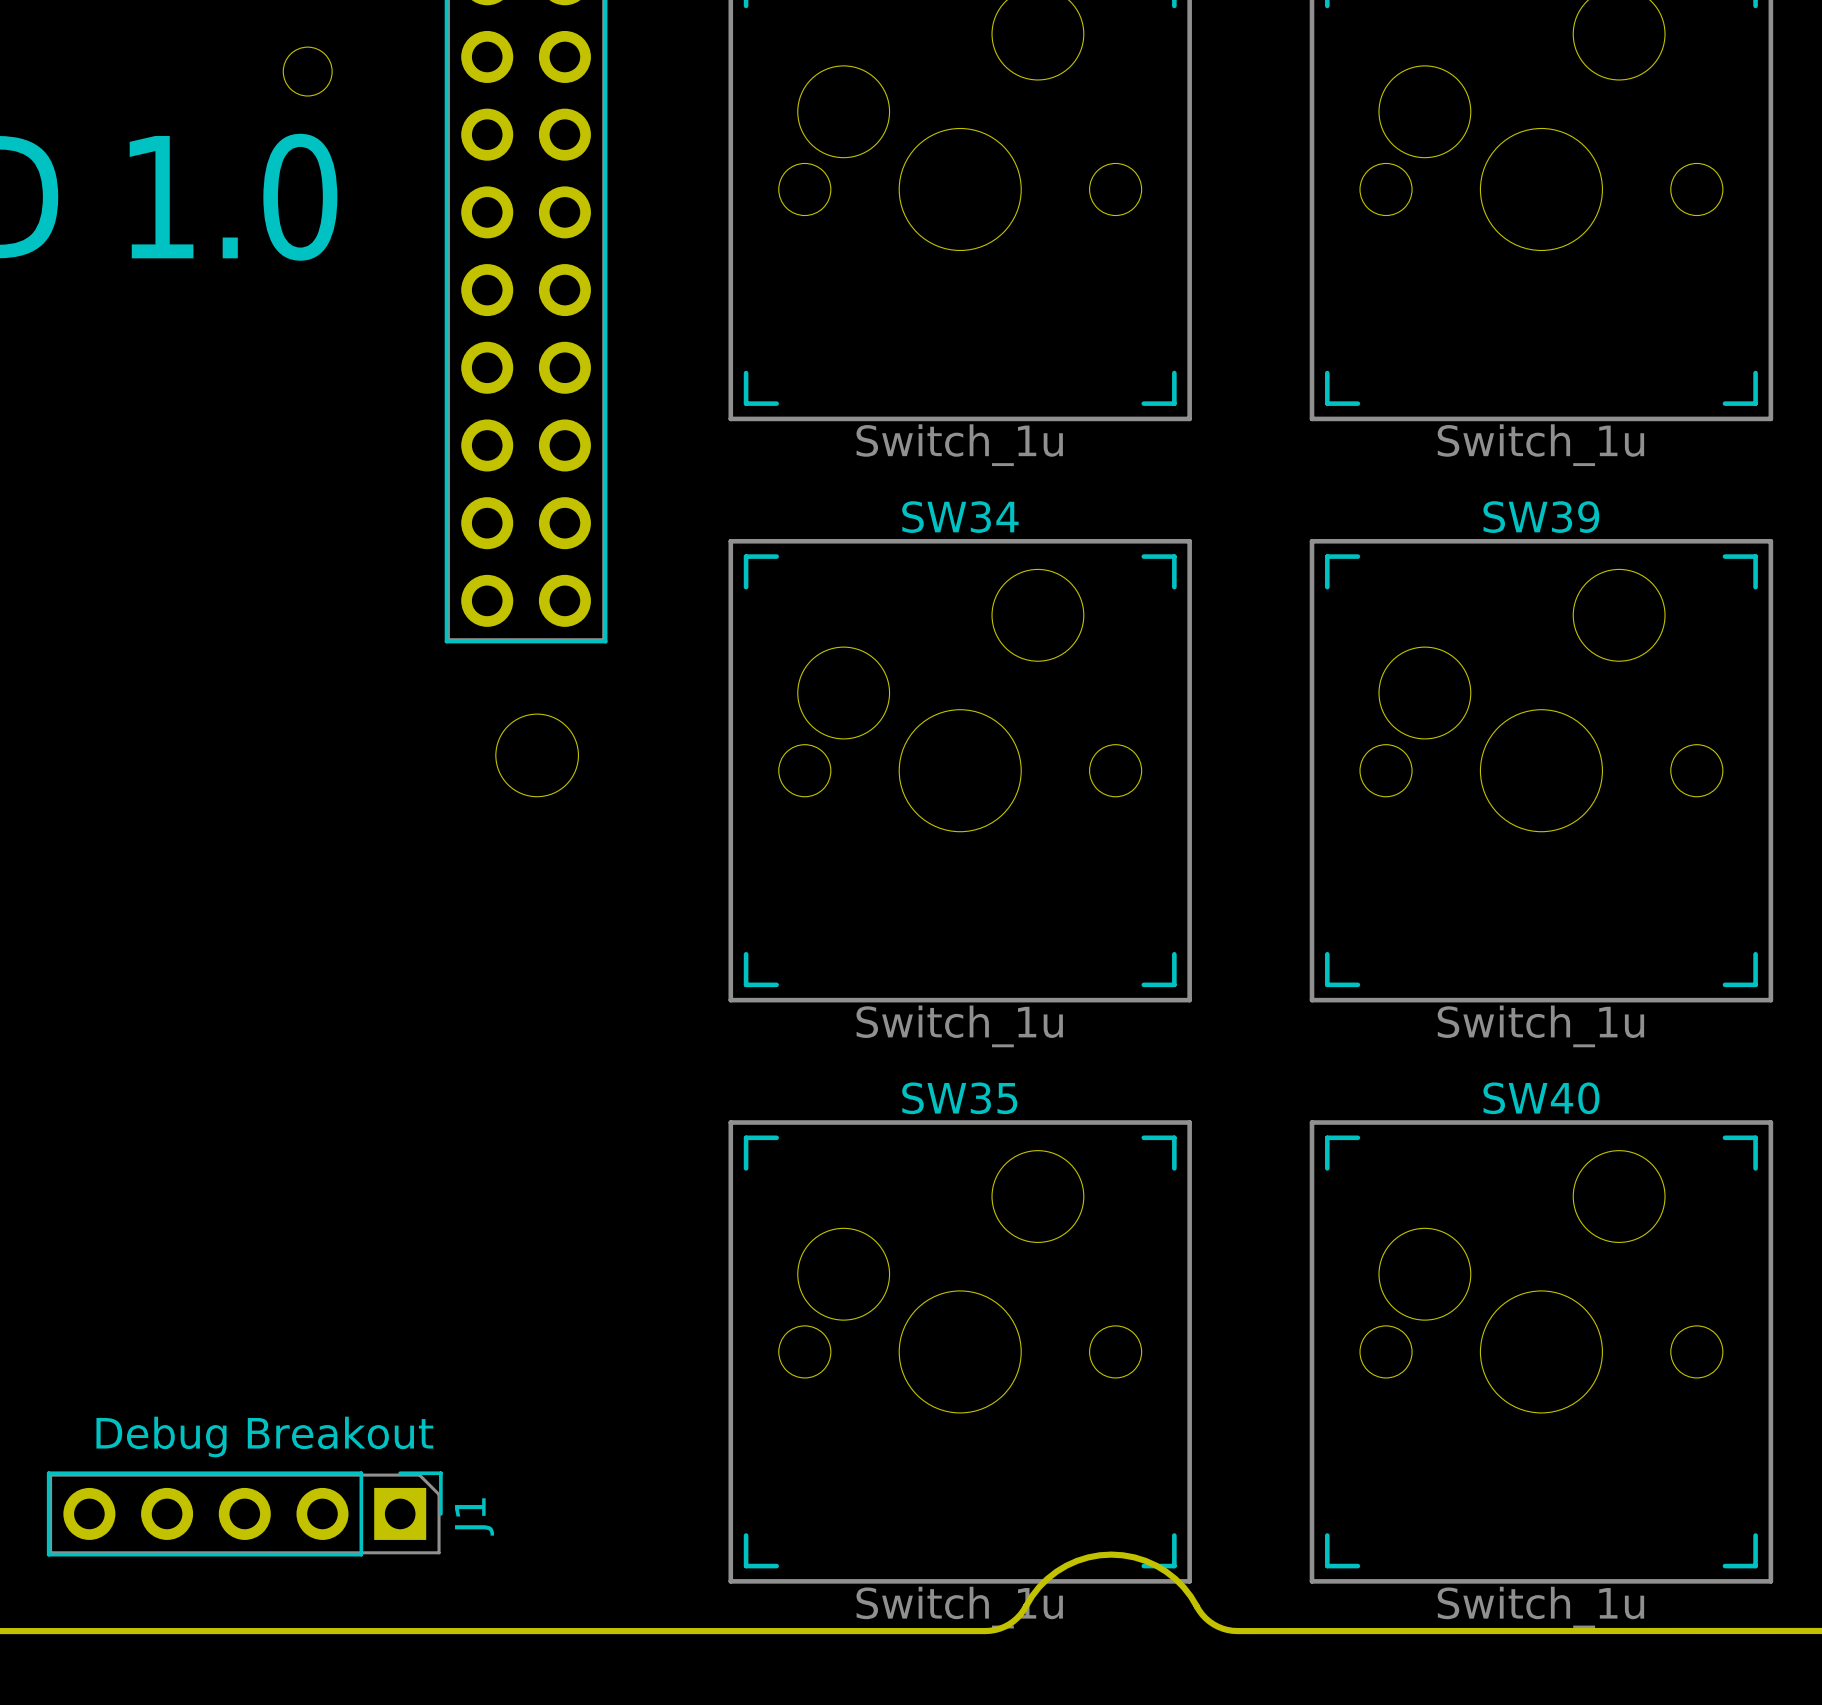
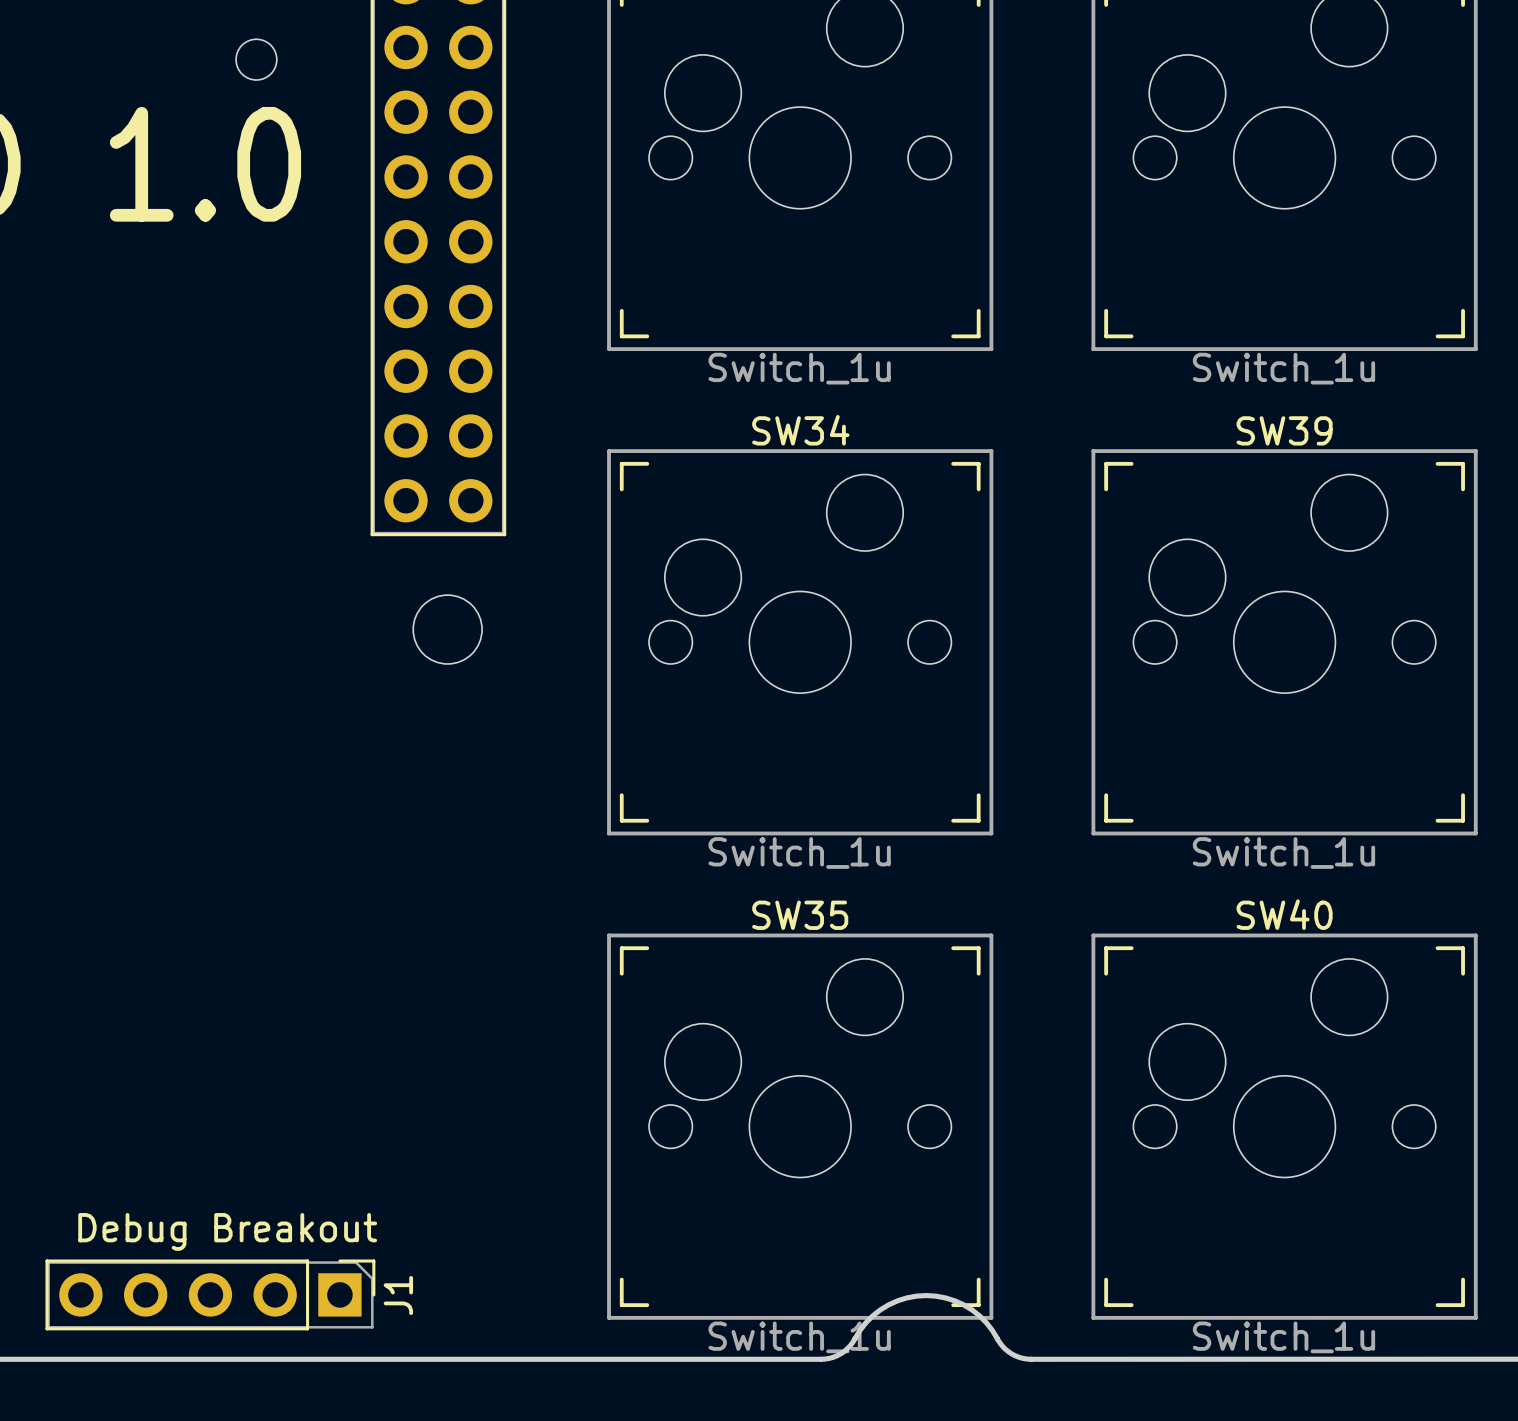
J1 position: (244, 1513) -> (210, 1294)

